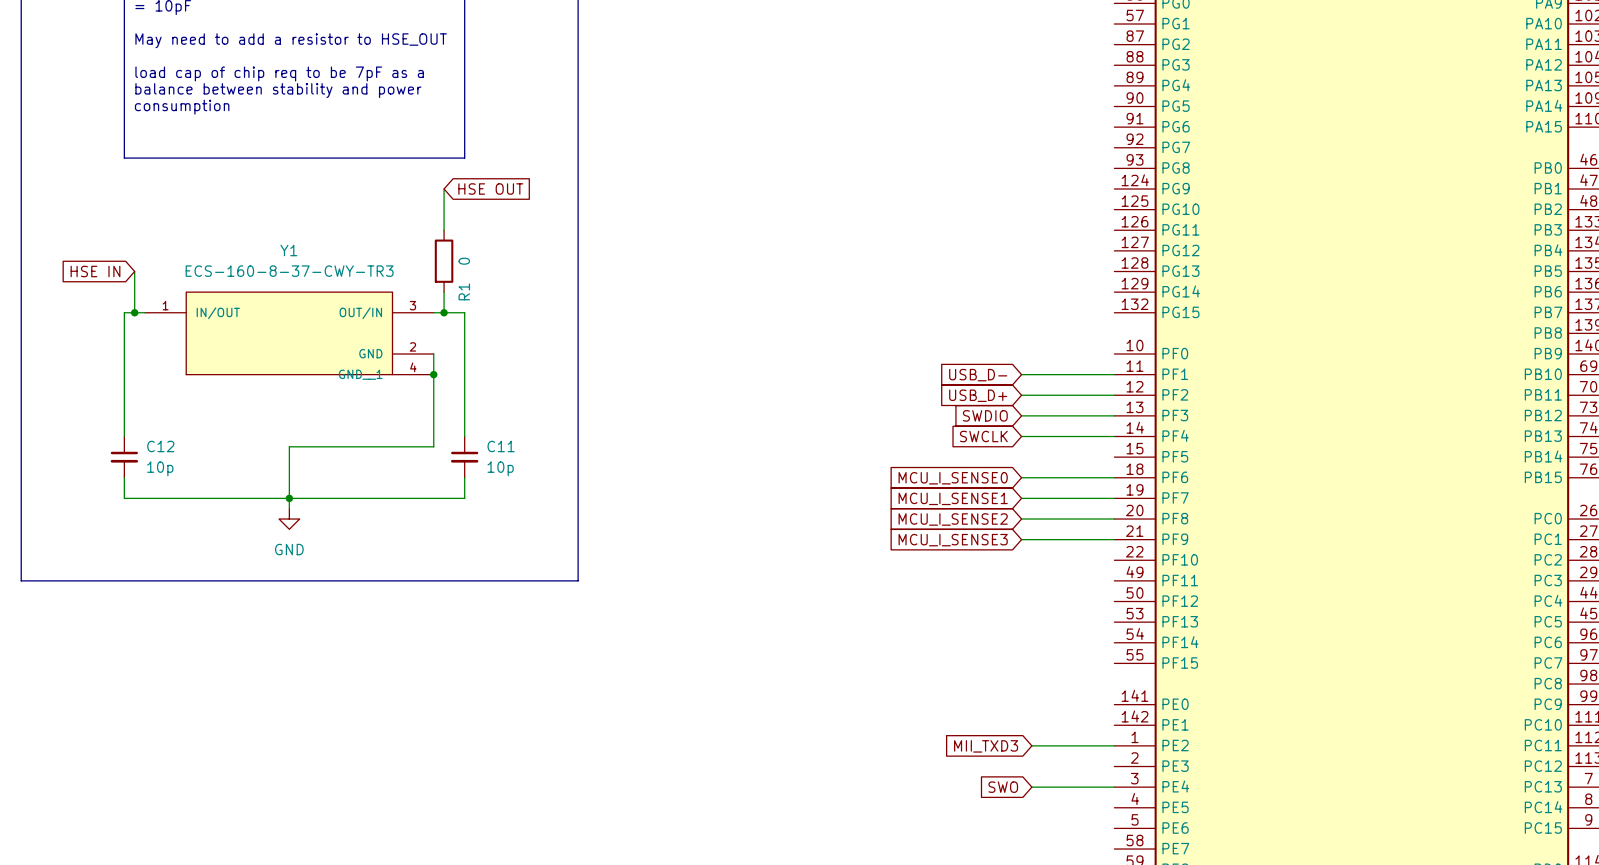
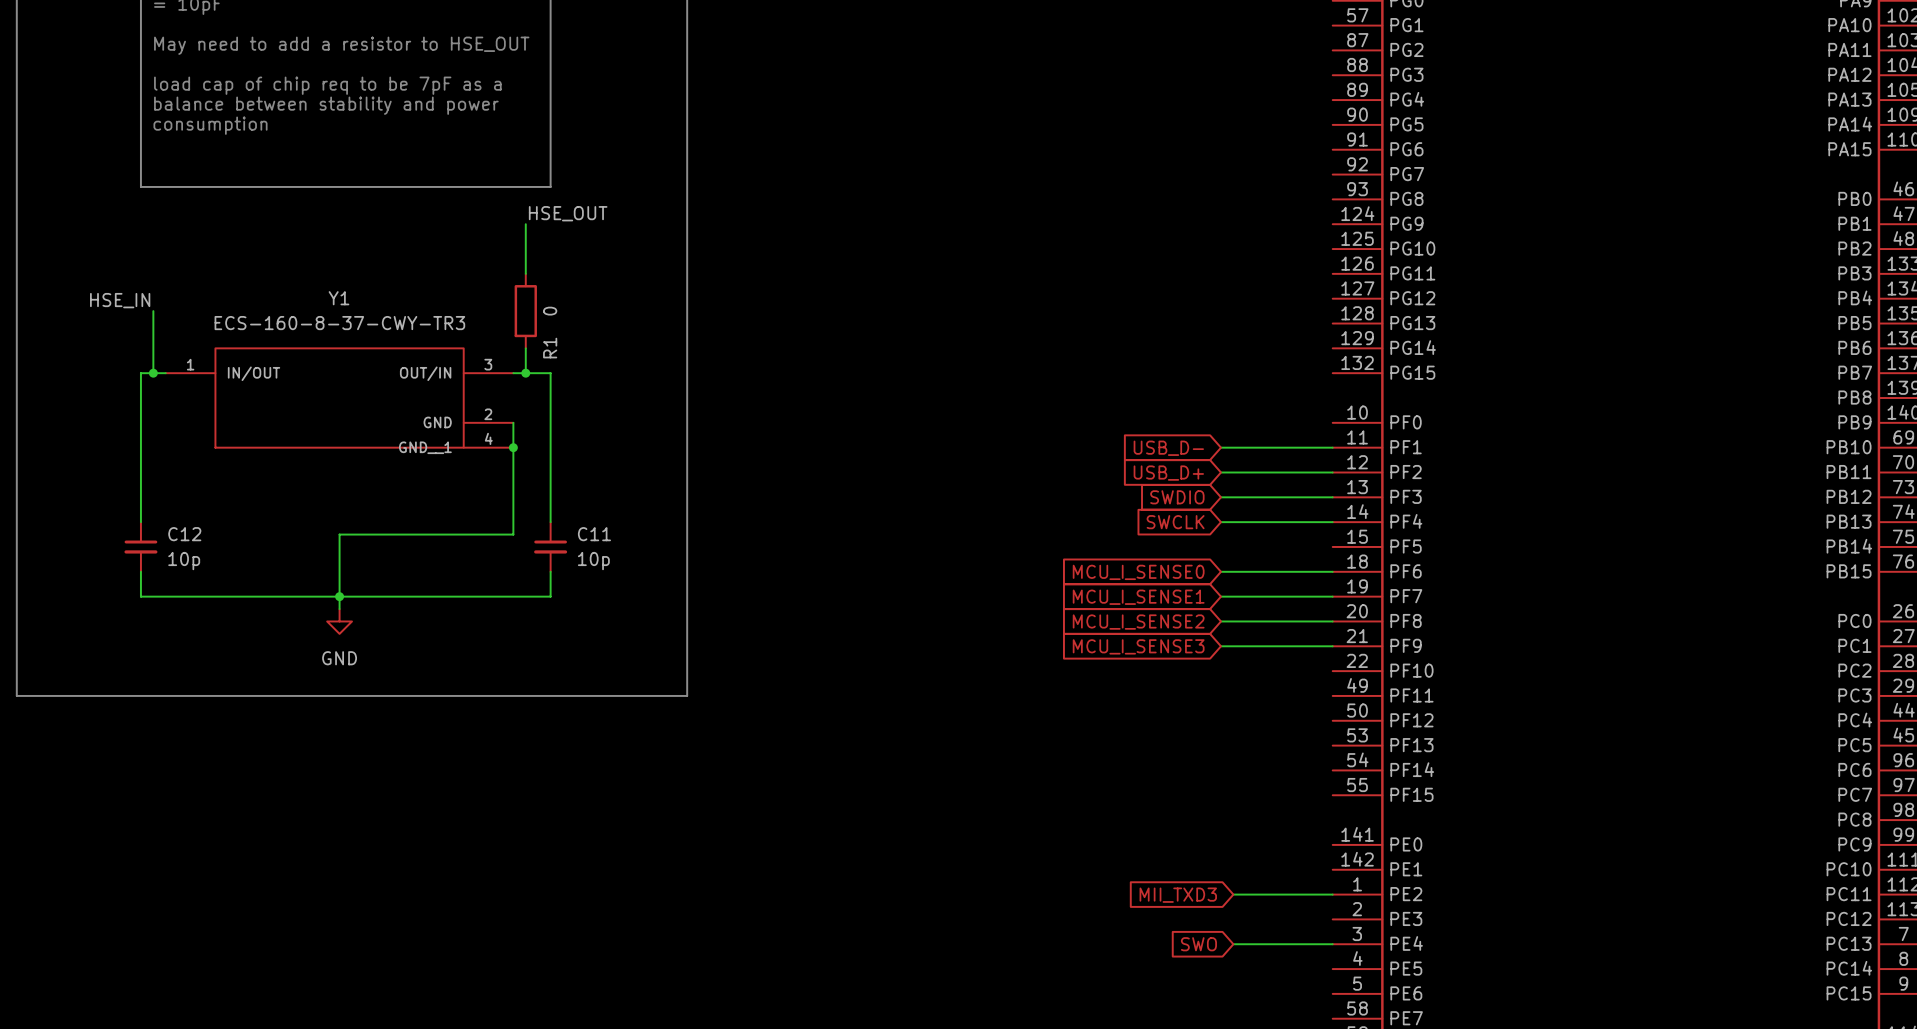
label: none -> HSE_OUT (568, 213)
global label: HSE OUT (490, 189) -> none
label: none -> HSE_IN (120, 300)
wire: none -> (153, 311) (153, 323)
global label: HSE IN (95, 271) -> none

